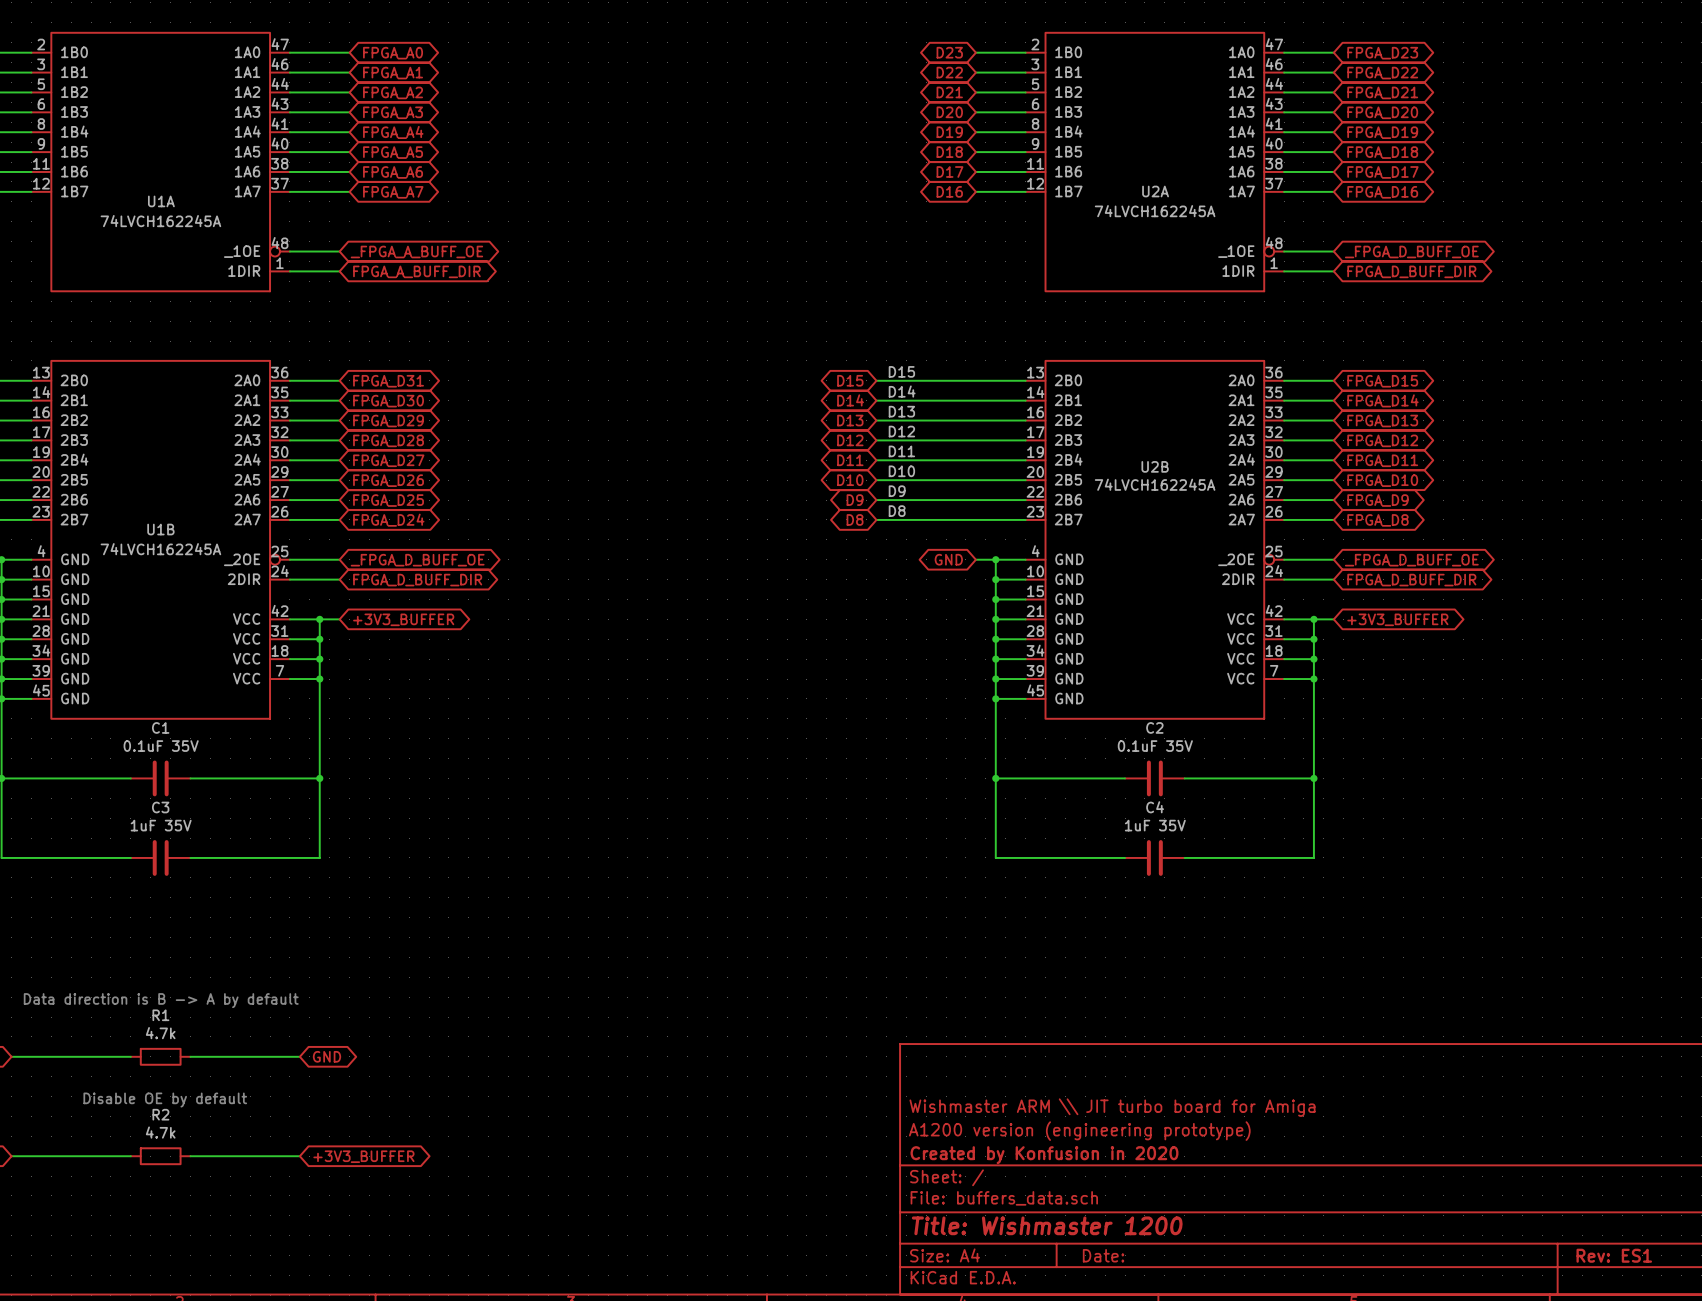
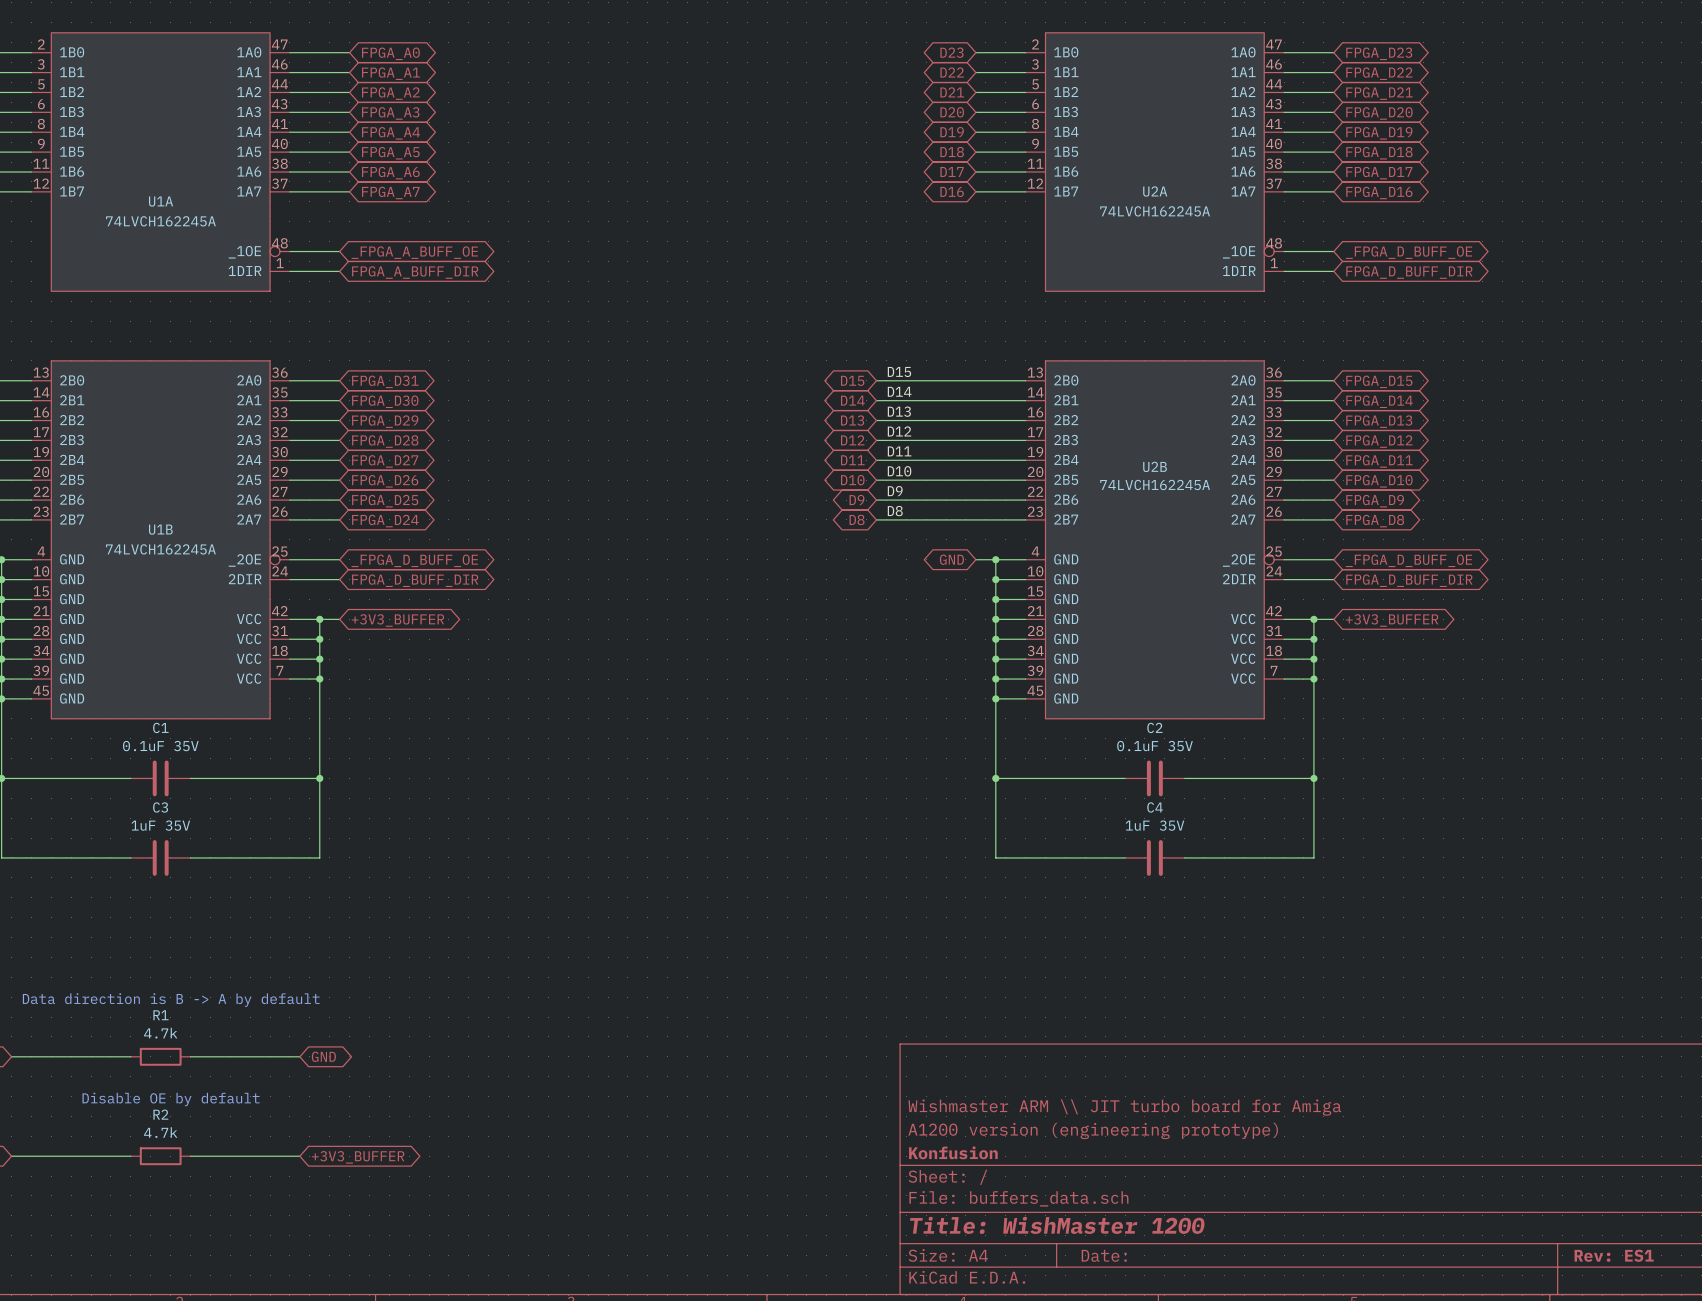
title block: Created by Konfusion in 2020 (1044, 1155) -> Konfusion (953, 1152)
title block: Title: Wishmaster 1200 (1047, 1225) -> Title: WishMaster 1200 (1057, 1225)

